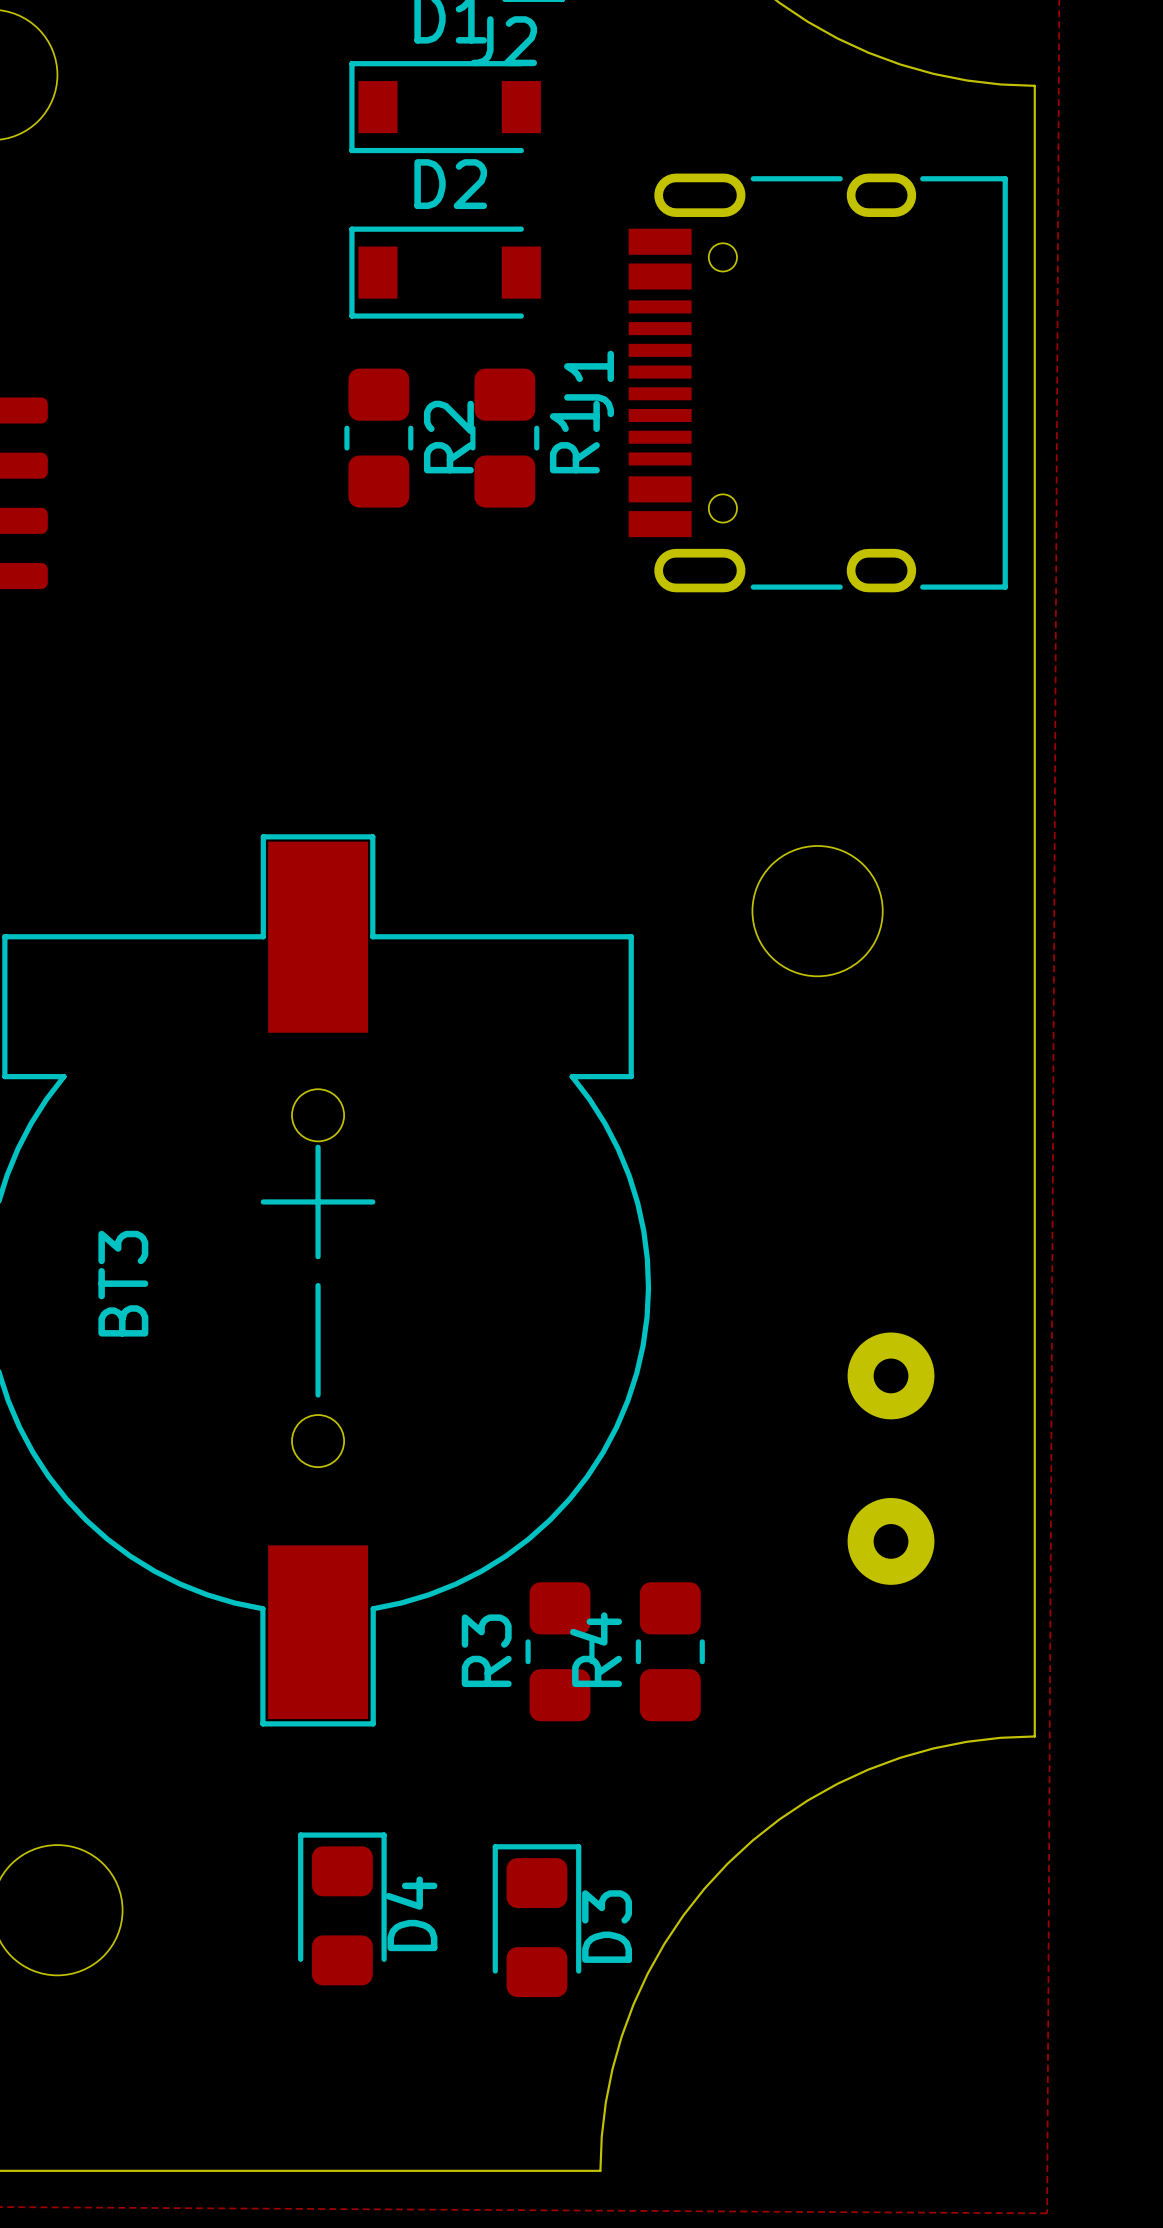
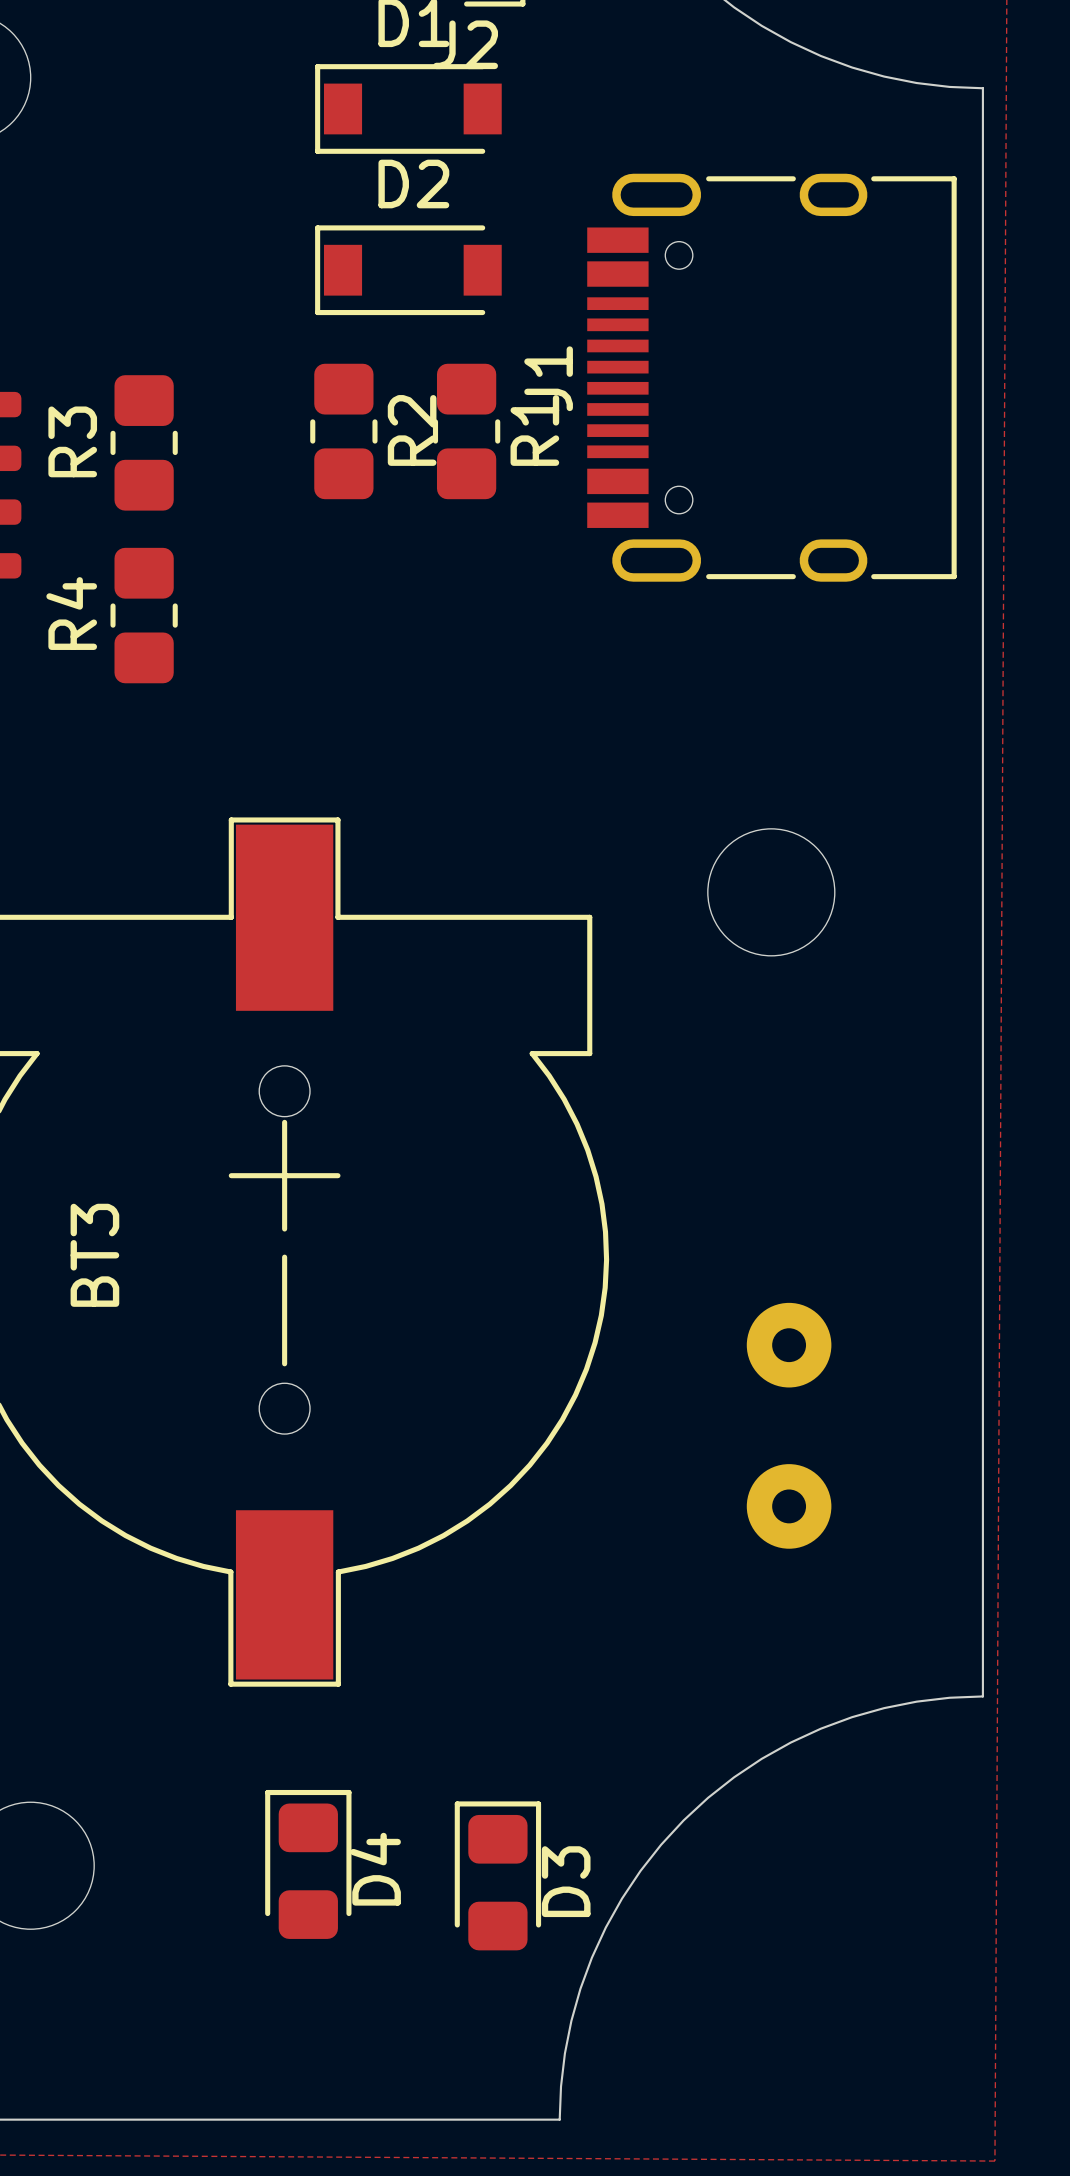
part position: (891, 1375) -> (789, 1345)
part position: (891, 1541) -> (789, 1506)
R3 position: (560, 1651) -> (144, 442)
R4 position: (670, 1651) -> (144, 615)

